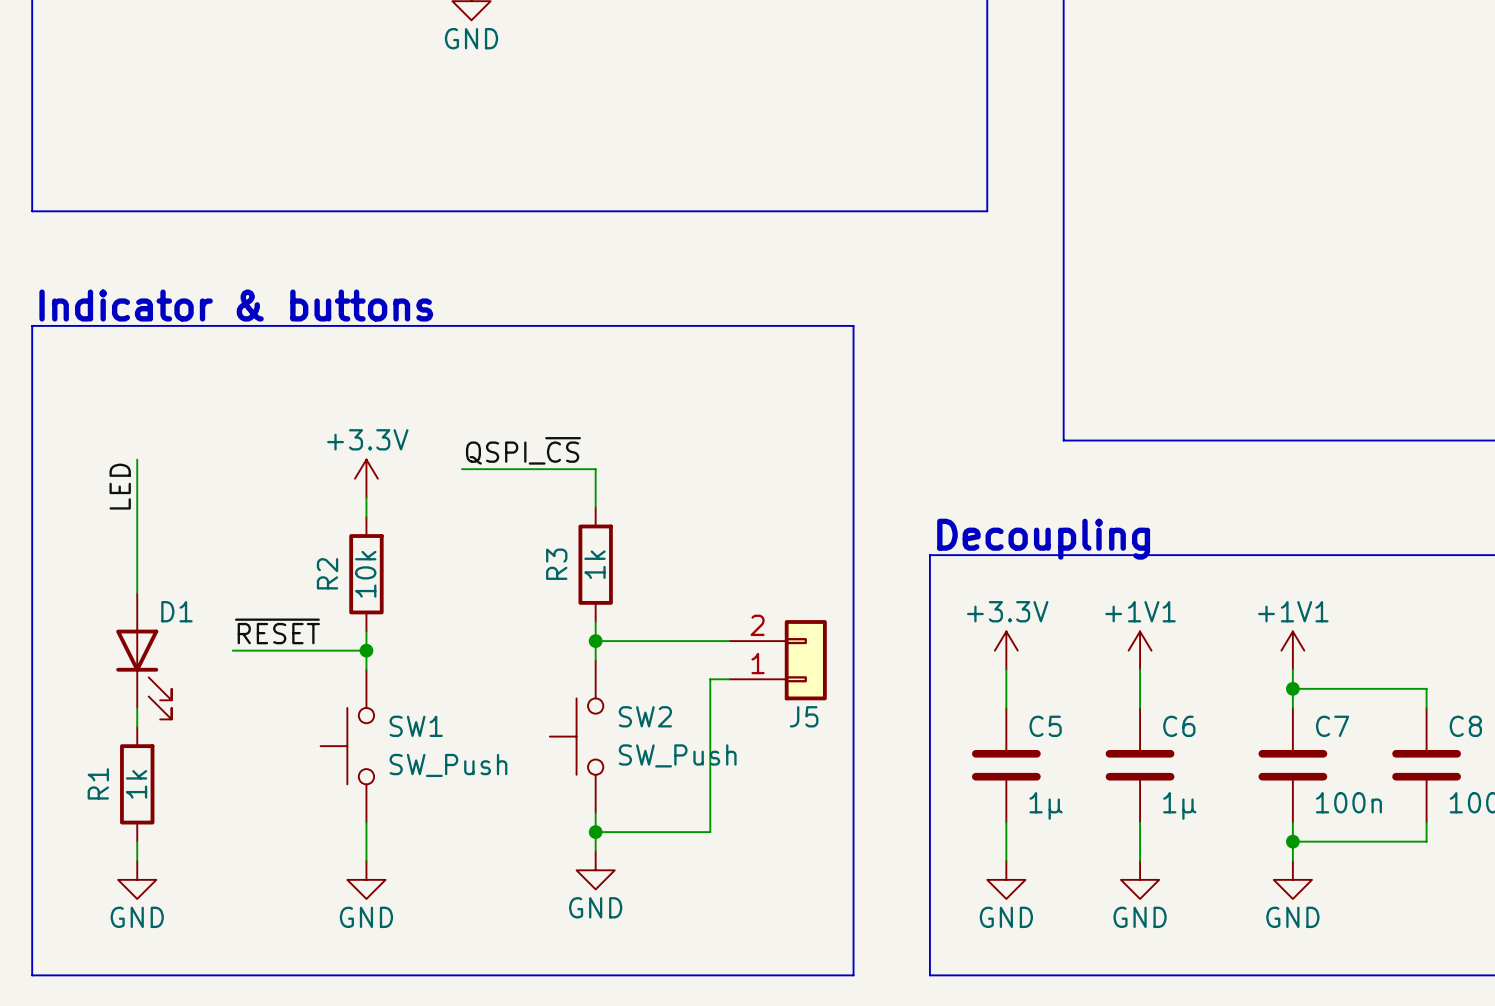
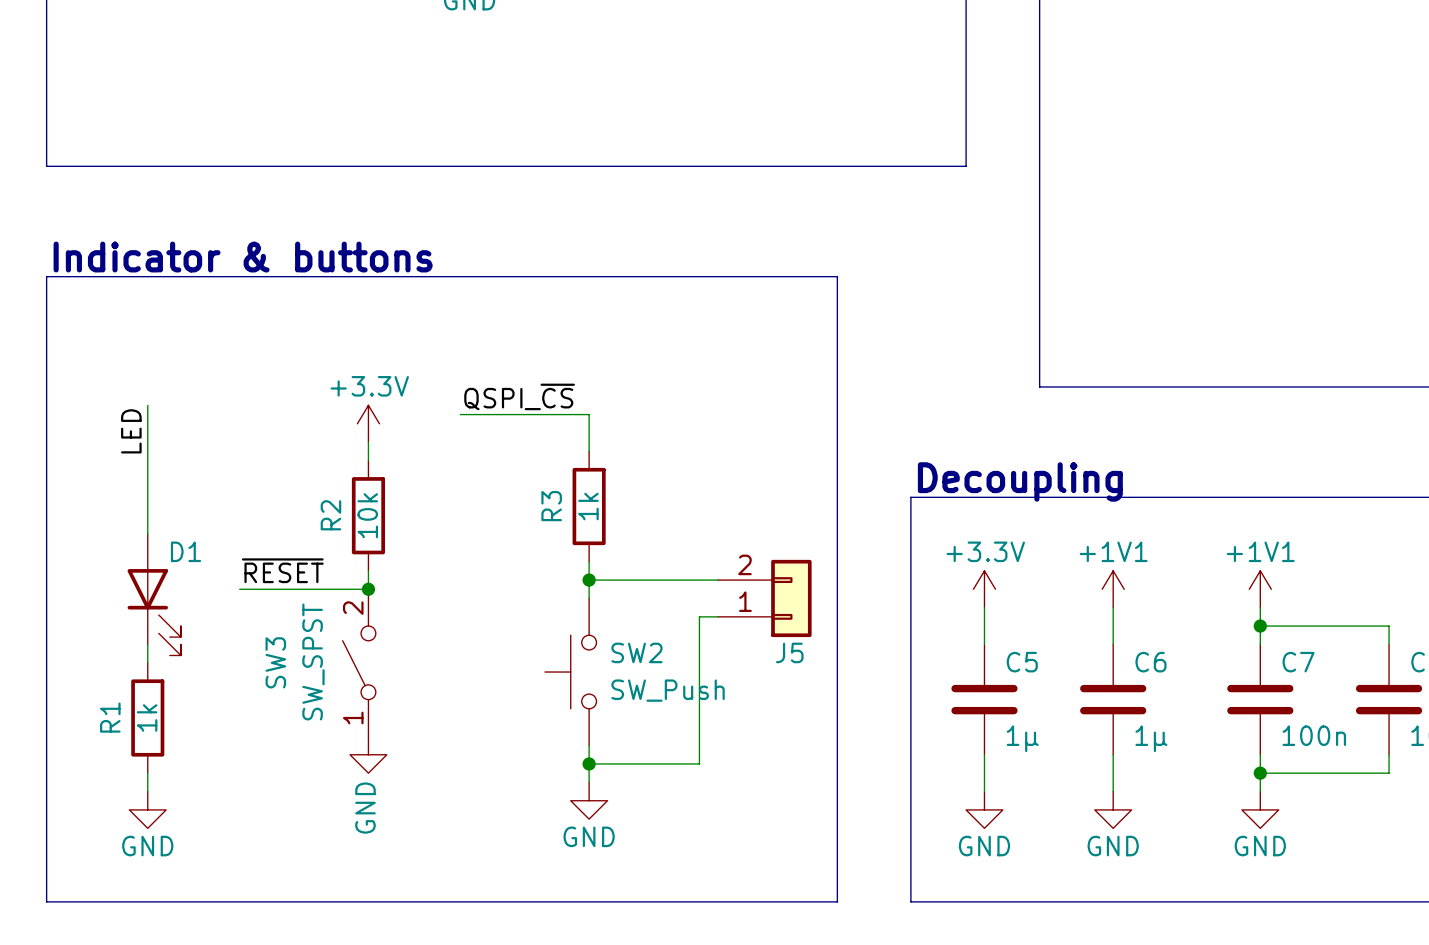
SW3: none -> SW_SPST (359, 662)
SW1: SW_Push (347, 746) -> none
wire: (366, 822) (366, 860) -> none
power symbol position: GND (366, 879) -> GND (368, 754)
power symbol text rotation: 0° (366, 917) -> 90° counterclockwise (365, 808)

